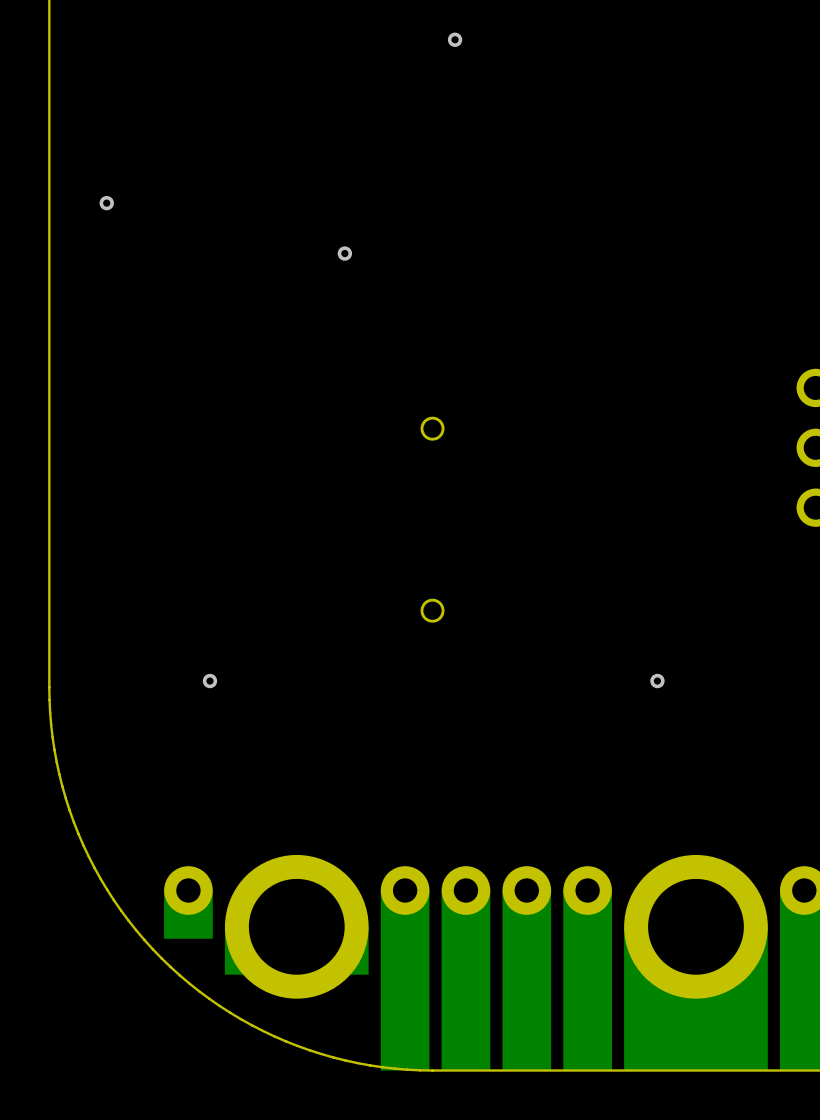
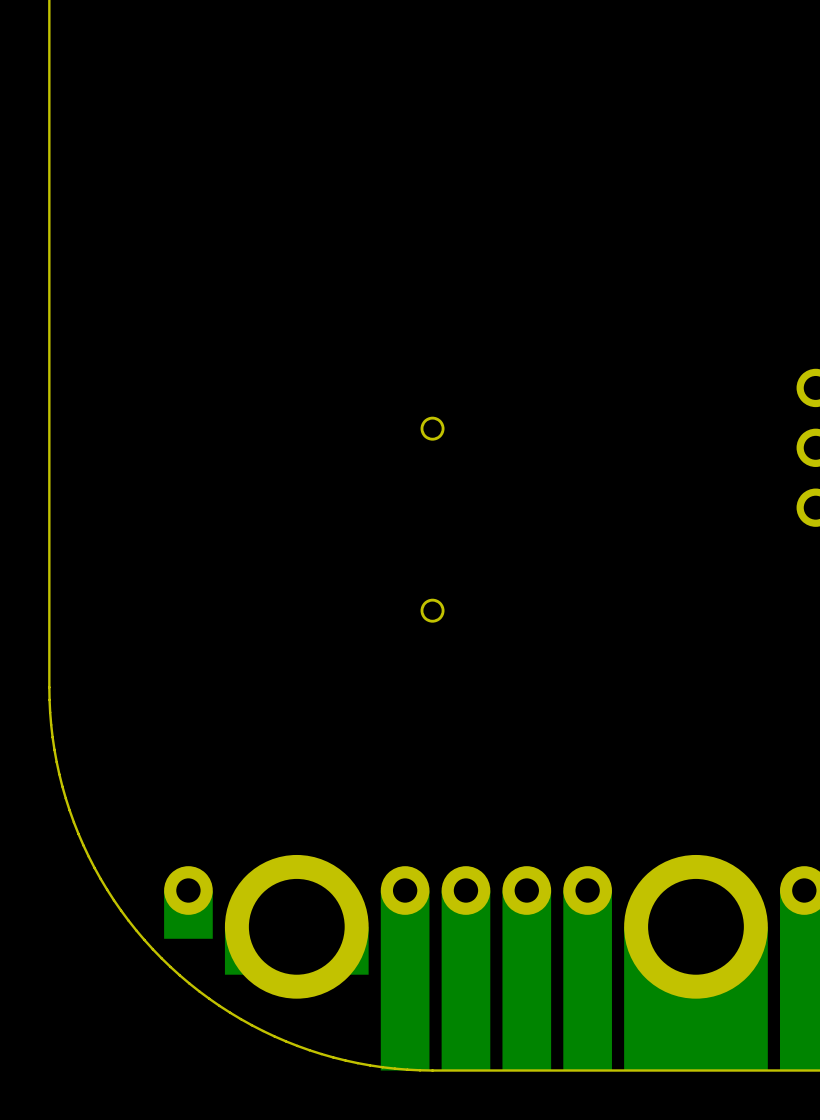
via: (455, 39) -> none
via: (106, 203) -> none
via: (344, 253) -> none
via: (209, 681) -> none
via: (657, 681) -> none

